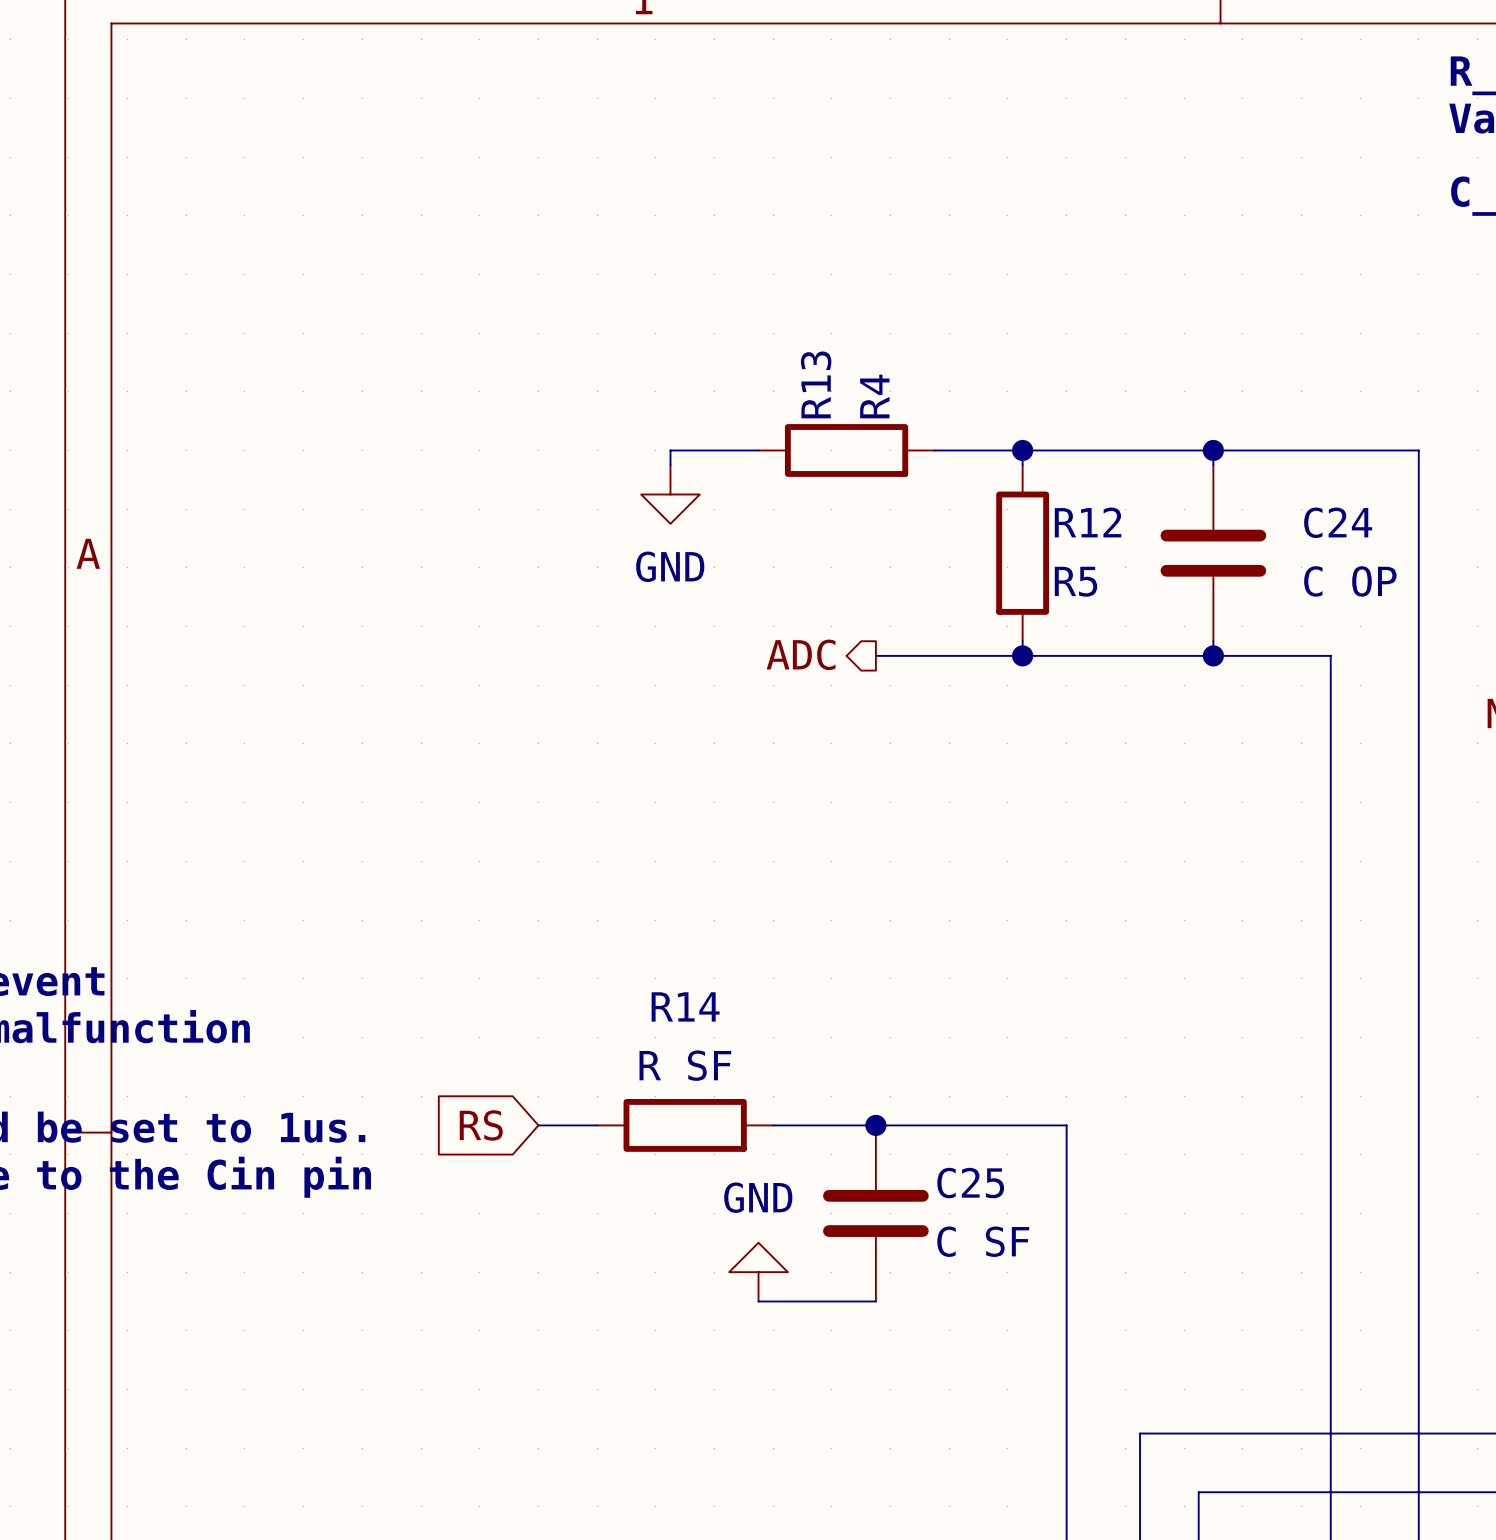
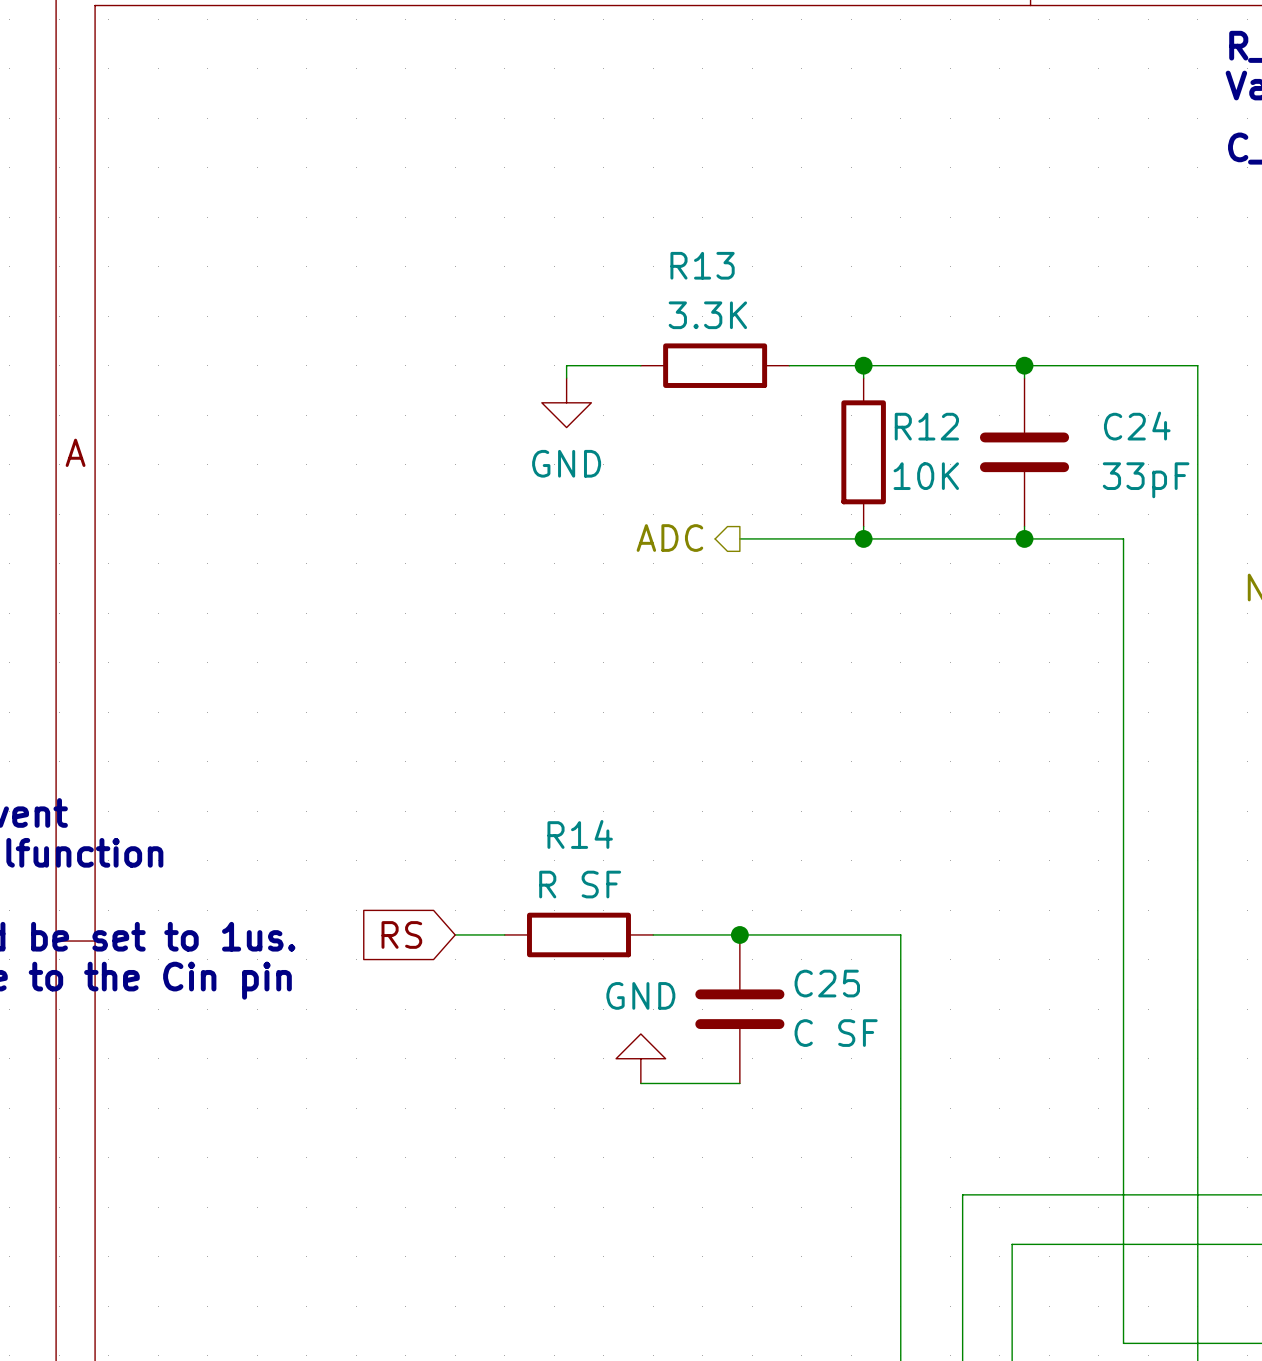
R13 name rotation: 0° (816, 384) -> 90° clockwise (702, 265)
R13 value: R4 (874, 396) -> 3.3K (707, 315)
R12 value: R5 (1076, 581) -> 10K (926, 476)
C24 value: C OP (1350, 581) -> 33pF (1146, 480)

